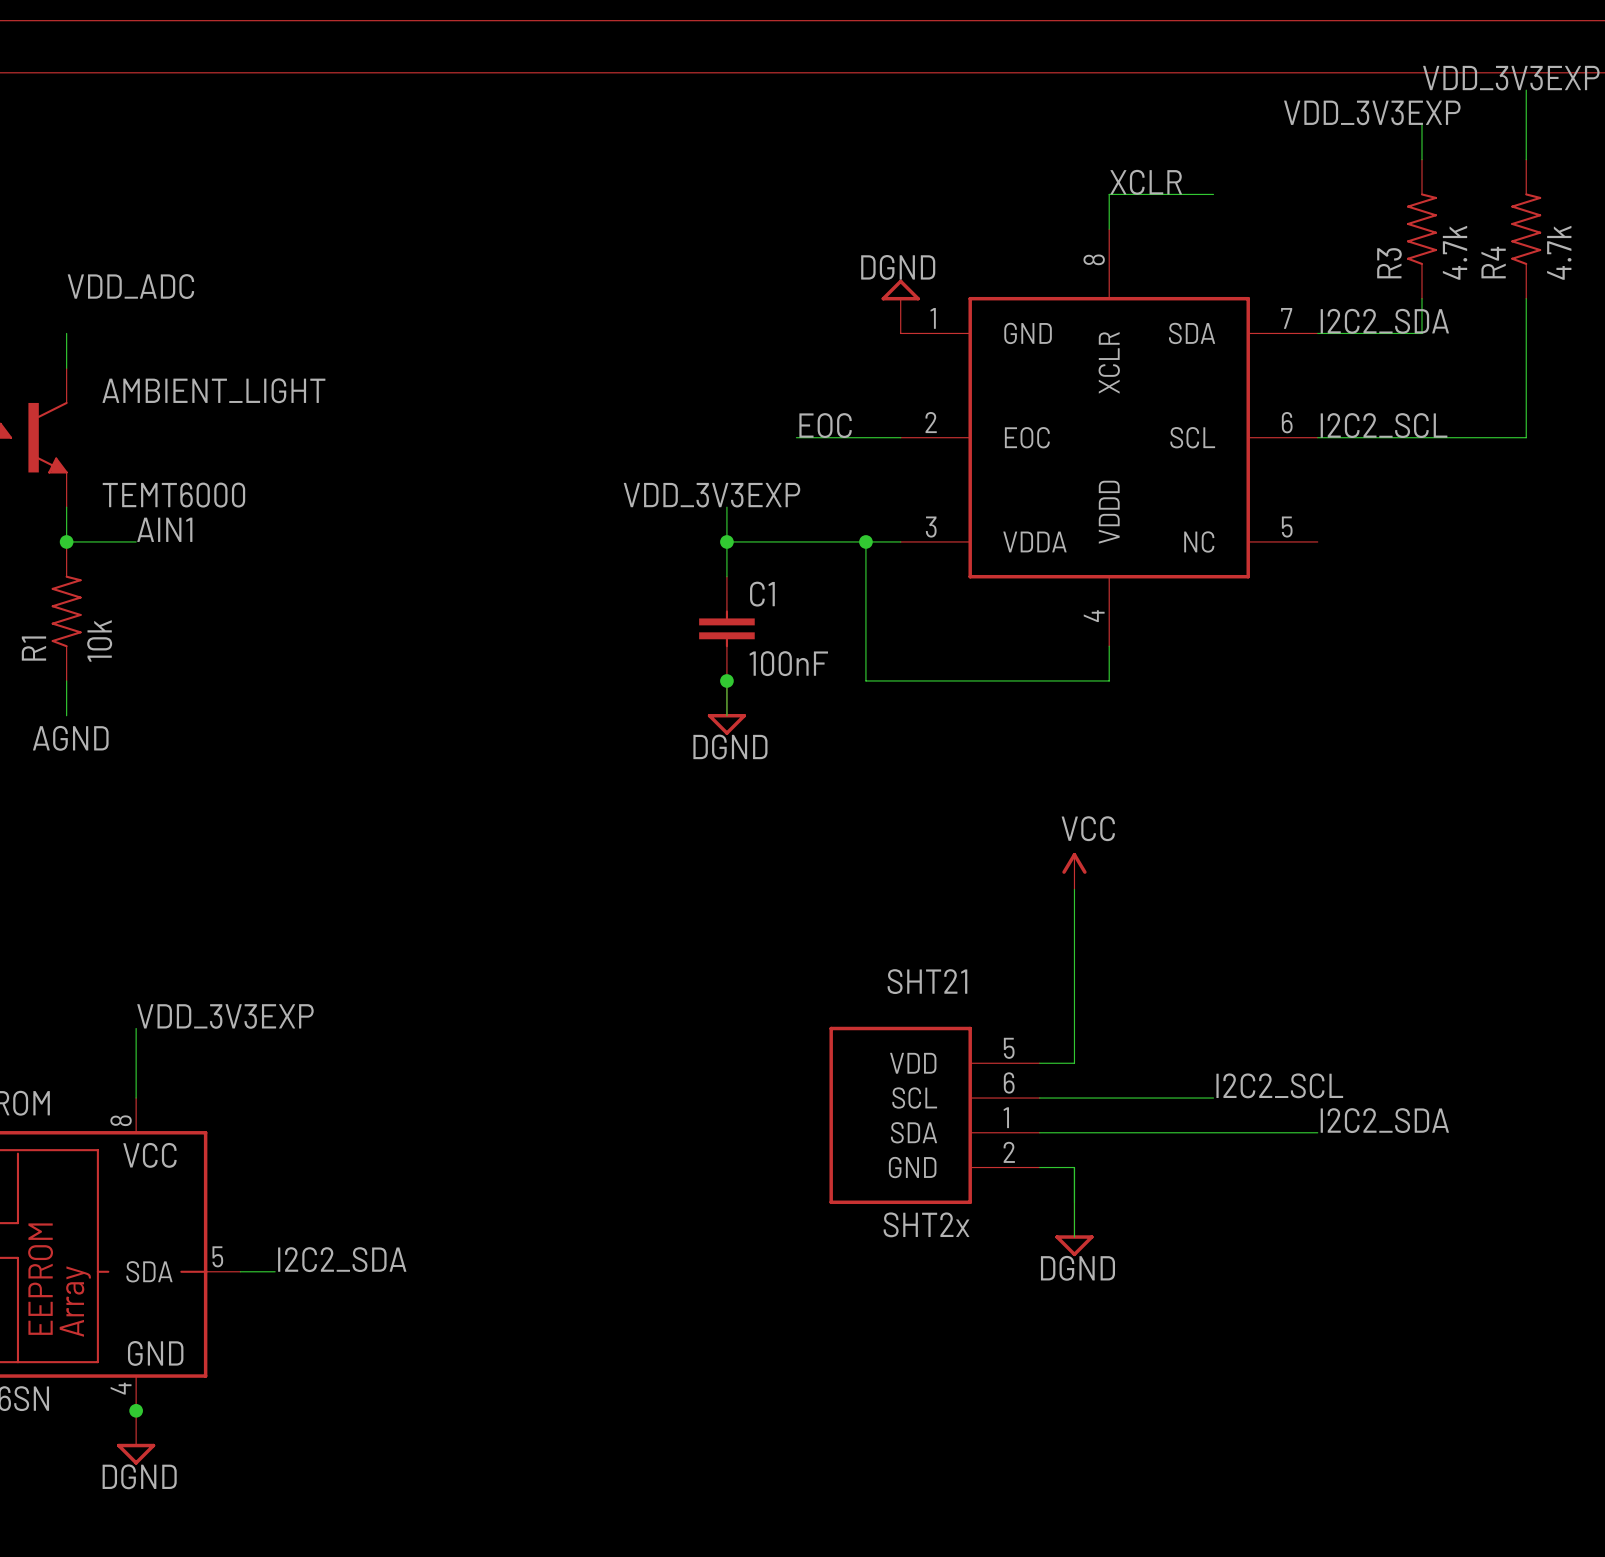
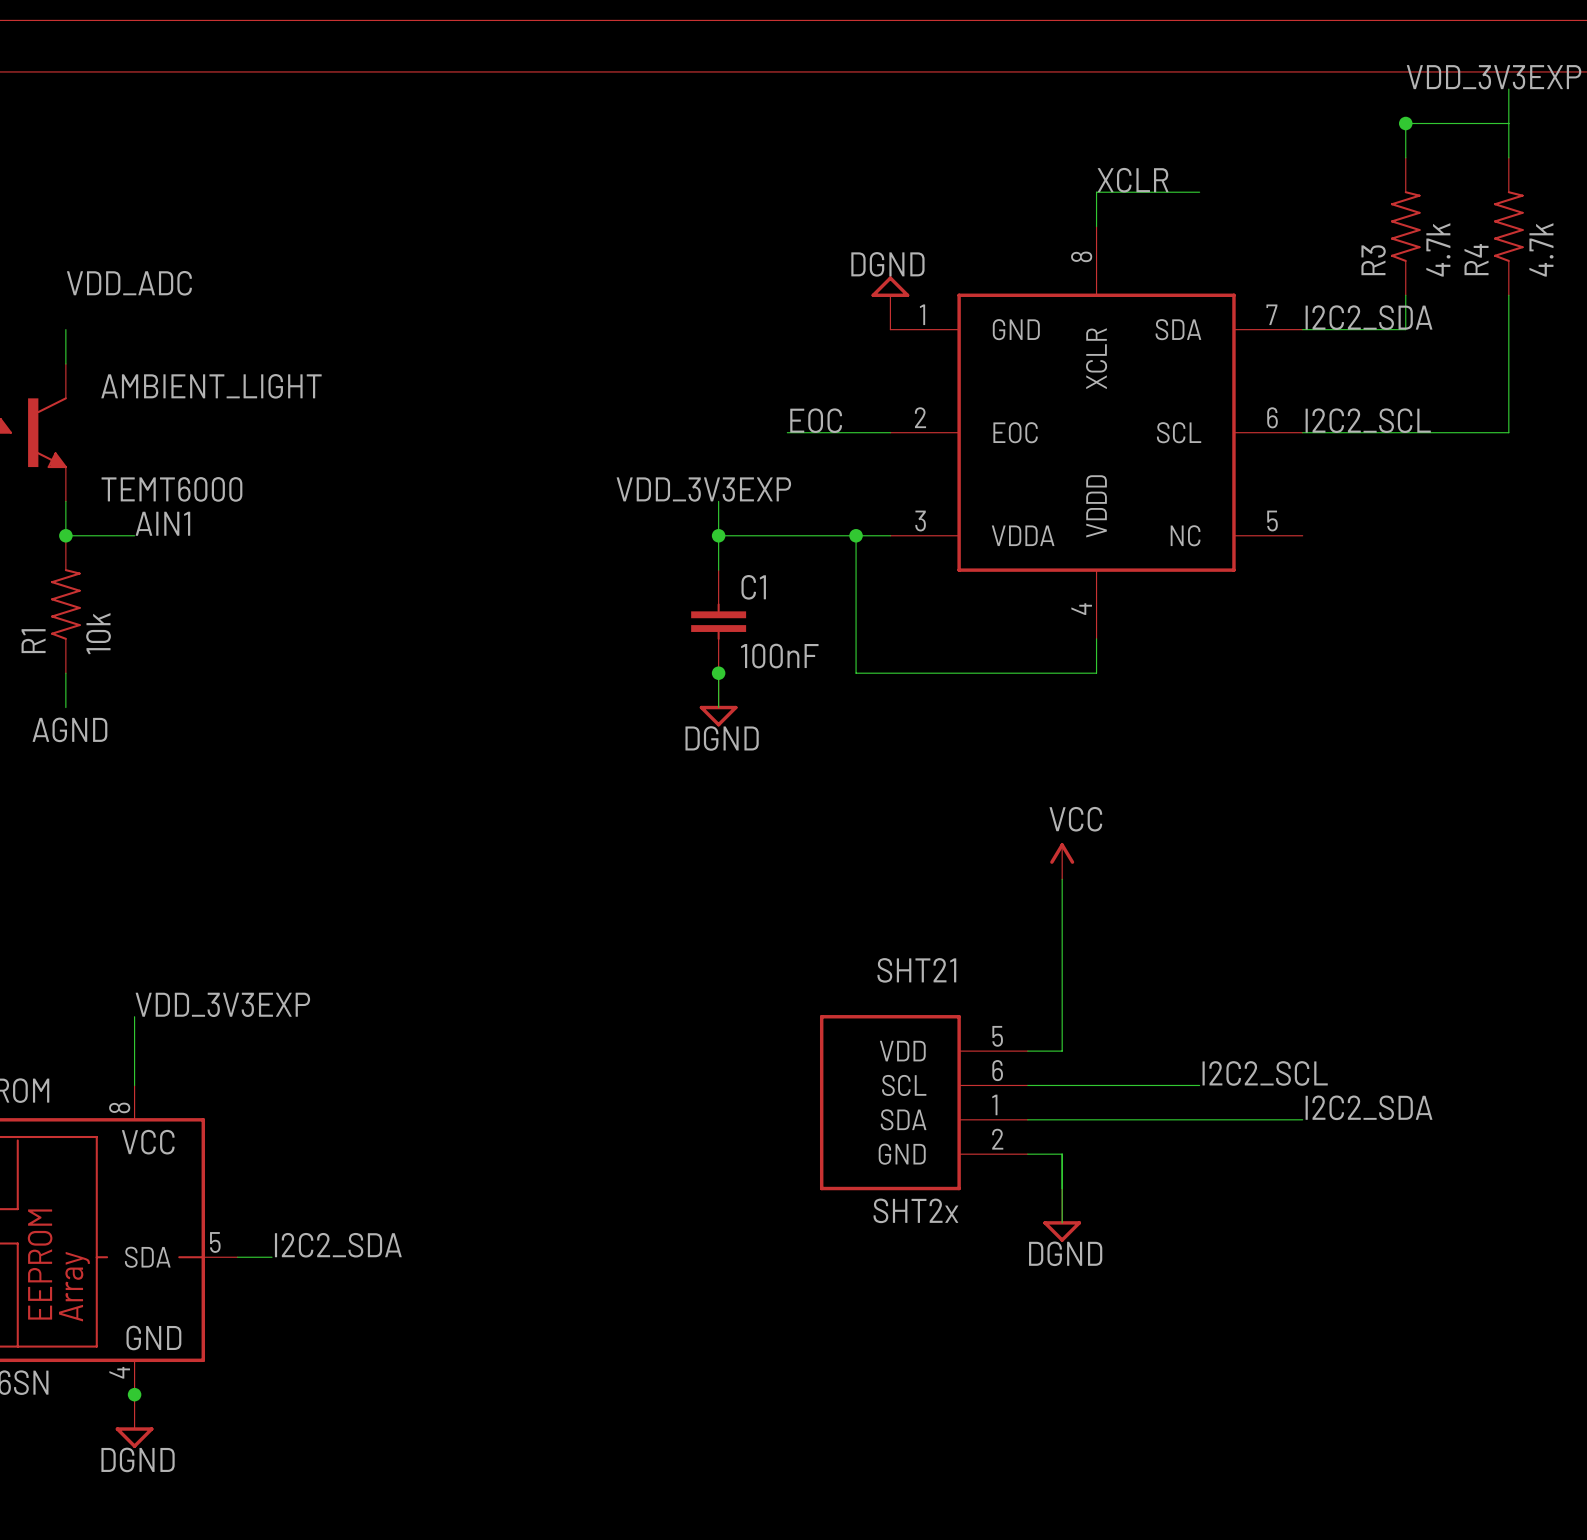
label: VDD_3V3EXP (1372, 112) -> none
wire: none -> (1405, 123) (1508, 123)
junction: none -> (1405, 123)

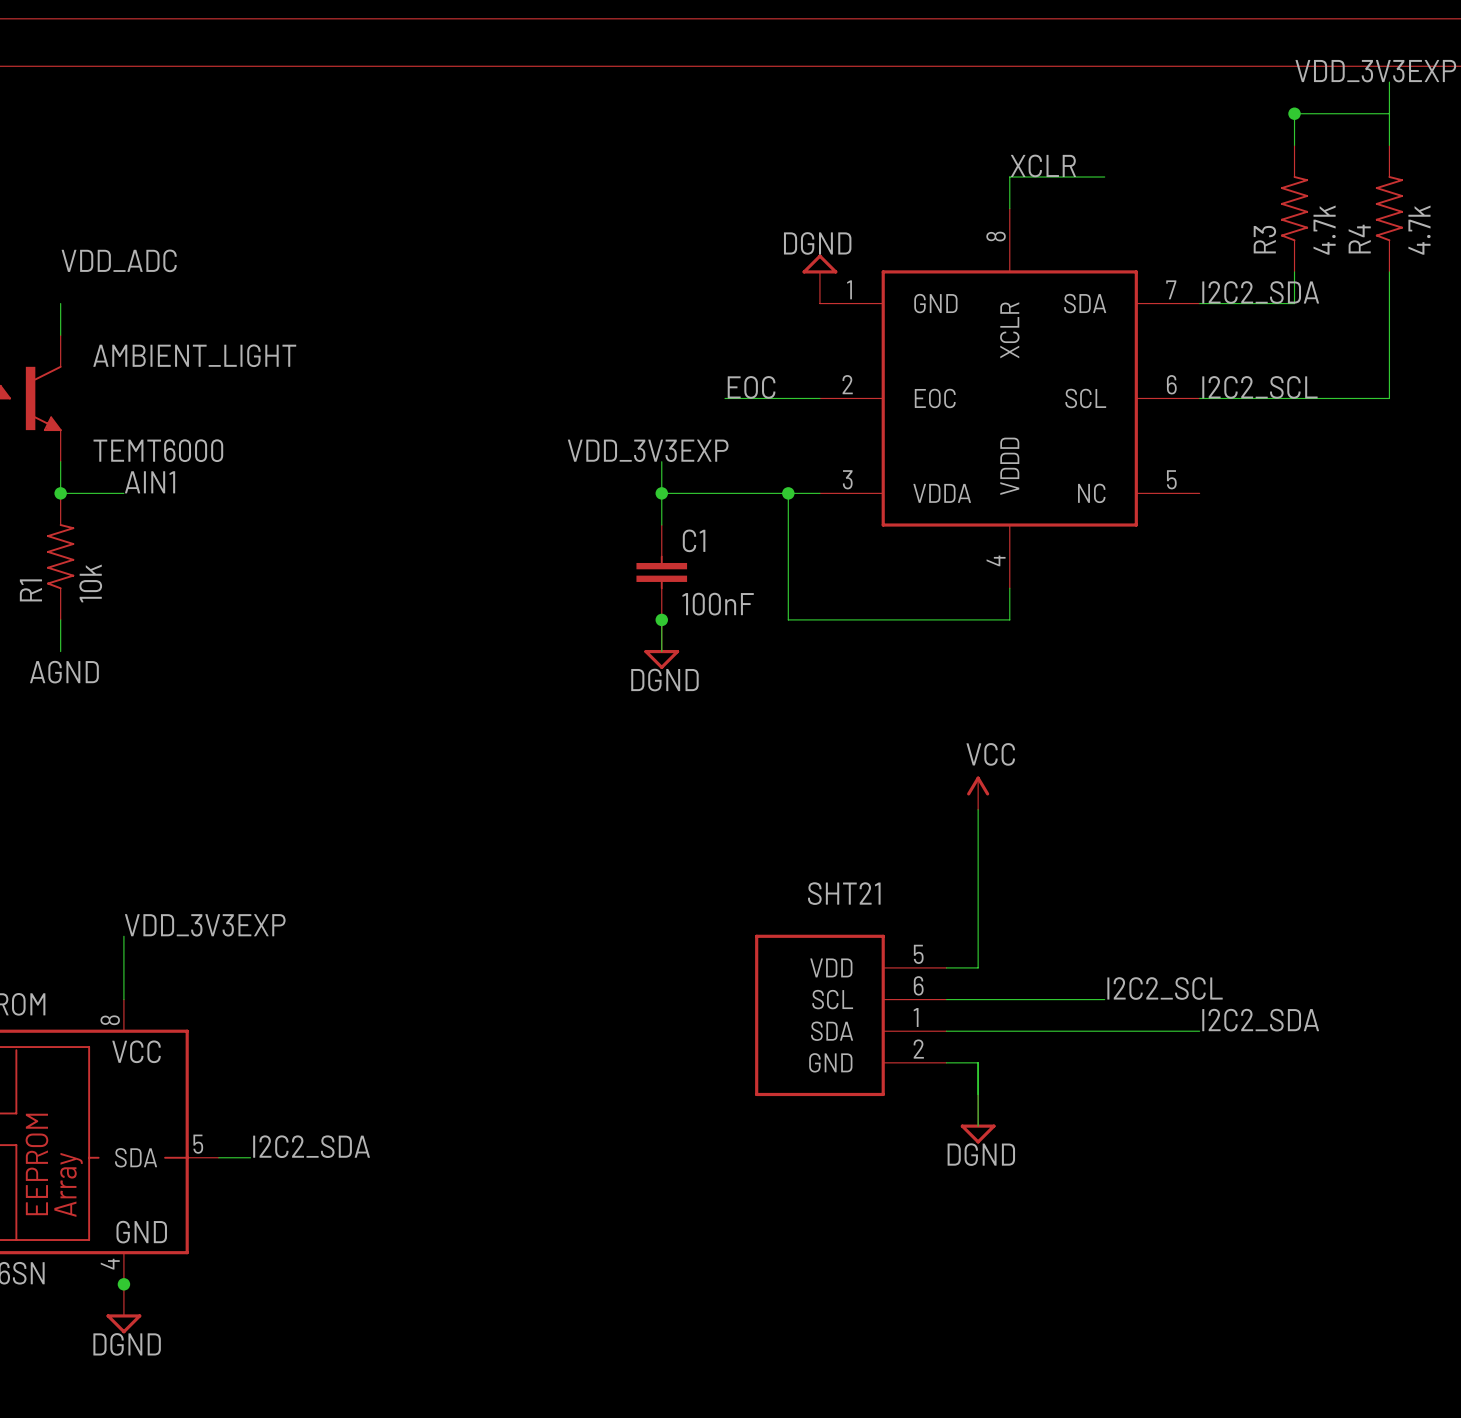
SHT21 value: SHT2x (915, 1210) -> none

